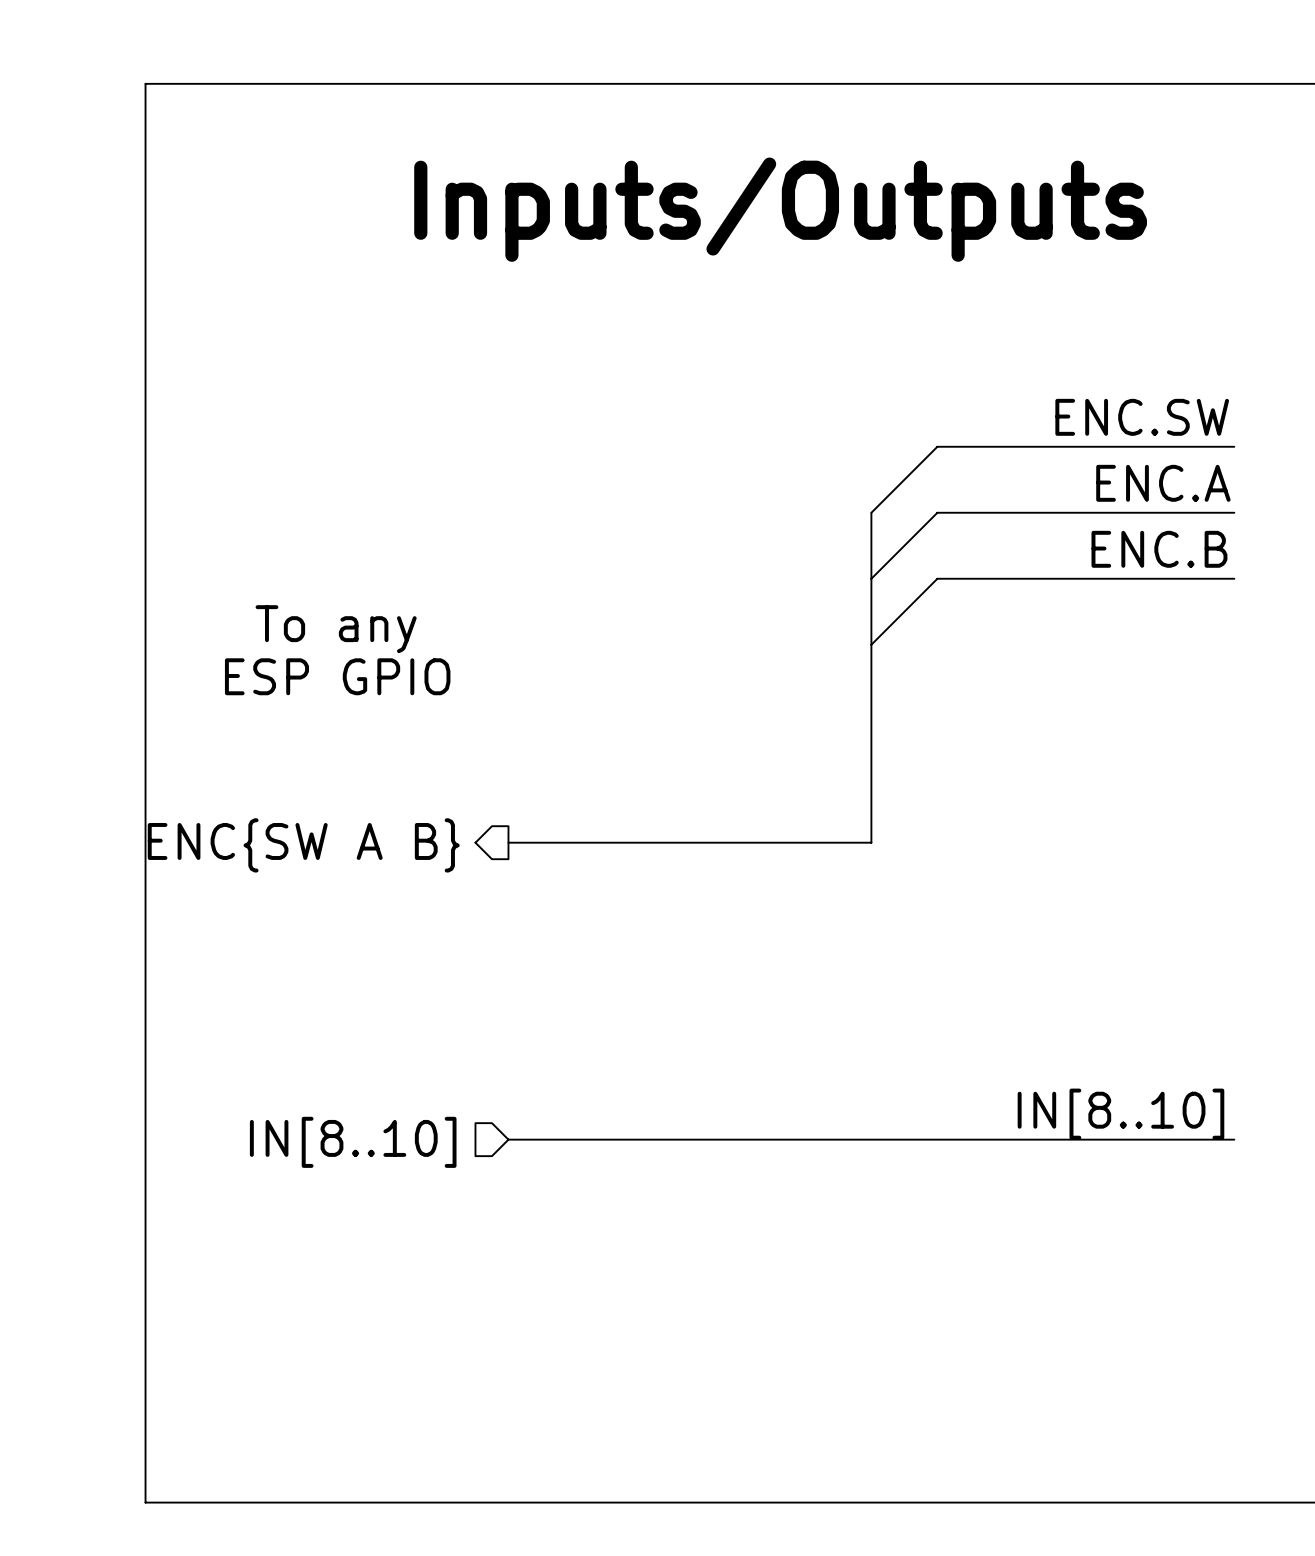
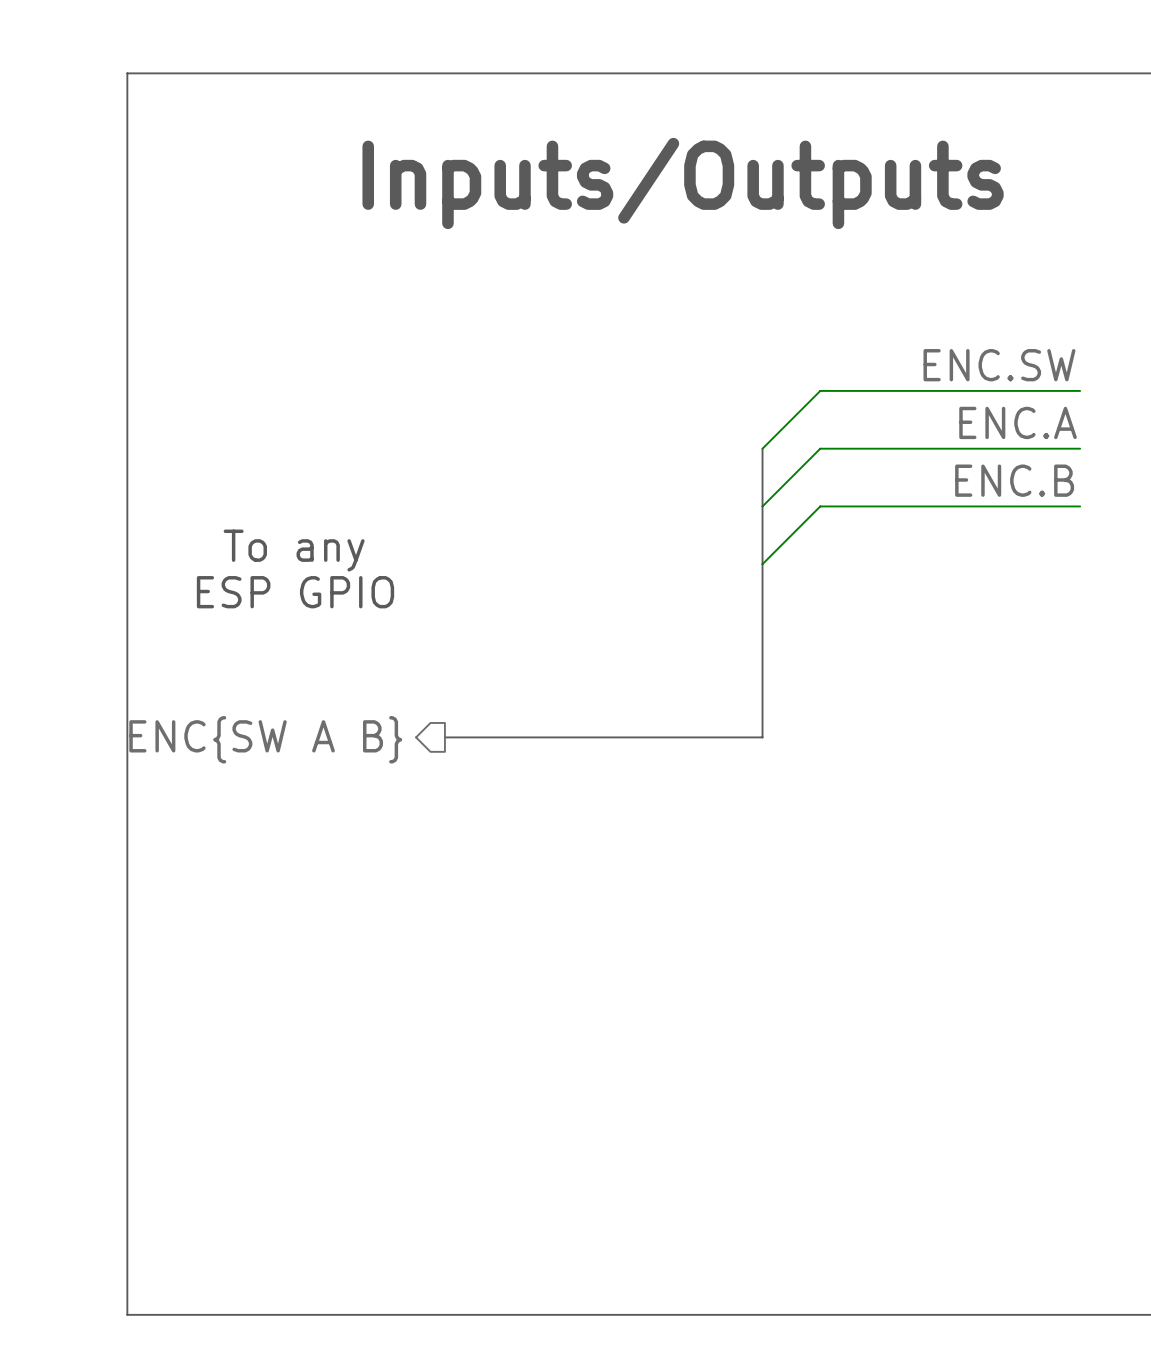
label: IN[8..10] (1120, 1114) -> none
bus: (508, 1139) (1234, 1139) -> none
hierarchical label: IN[8..10] (353, 1142) -> none

